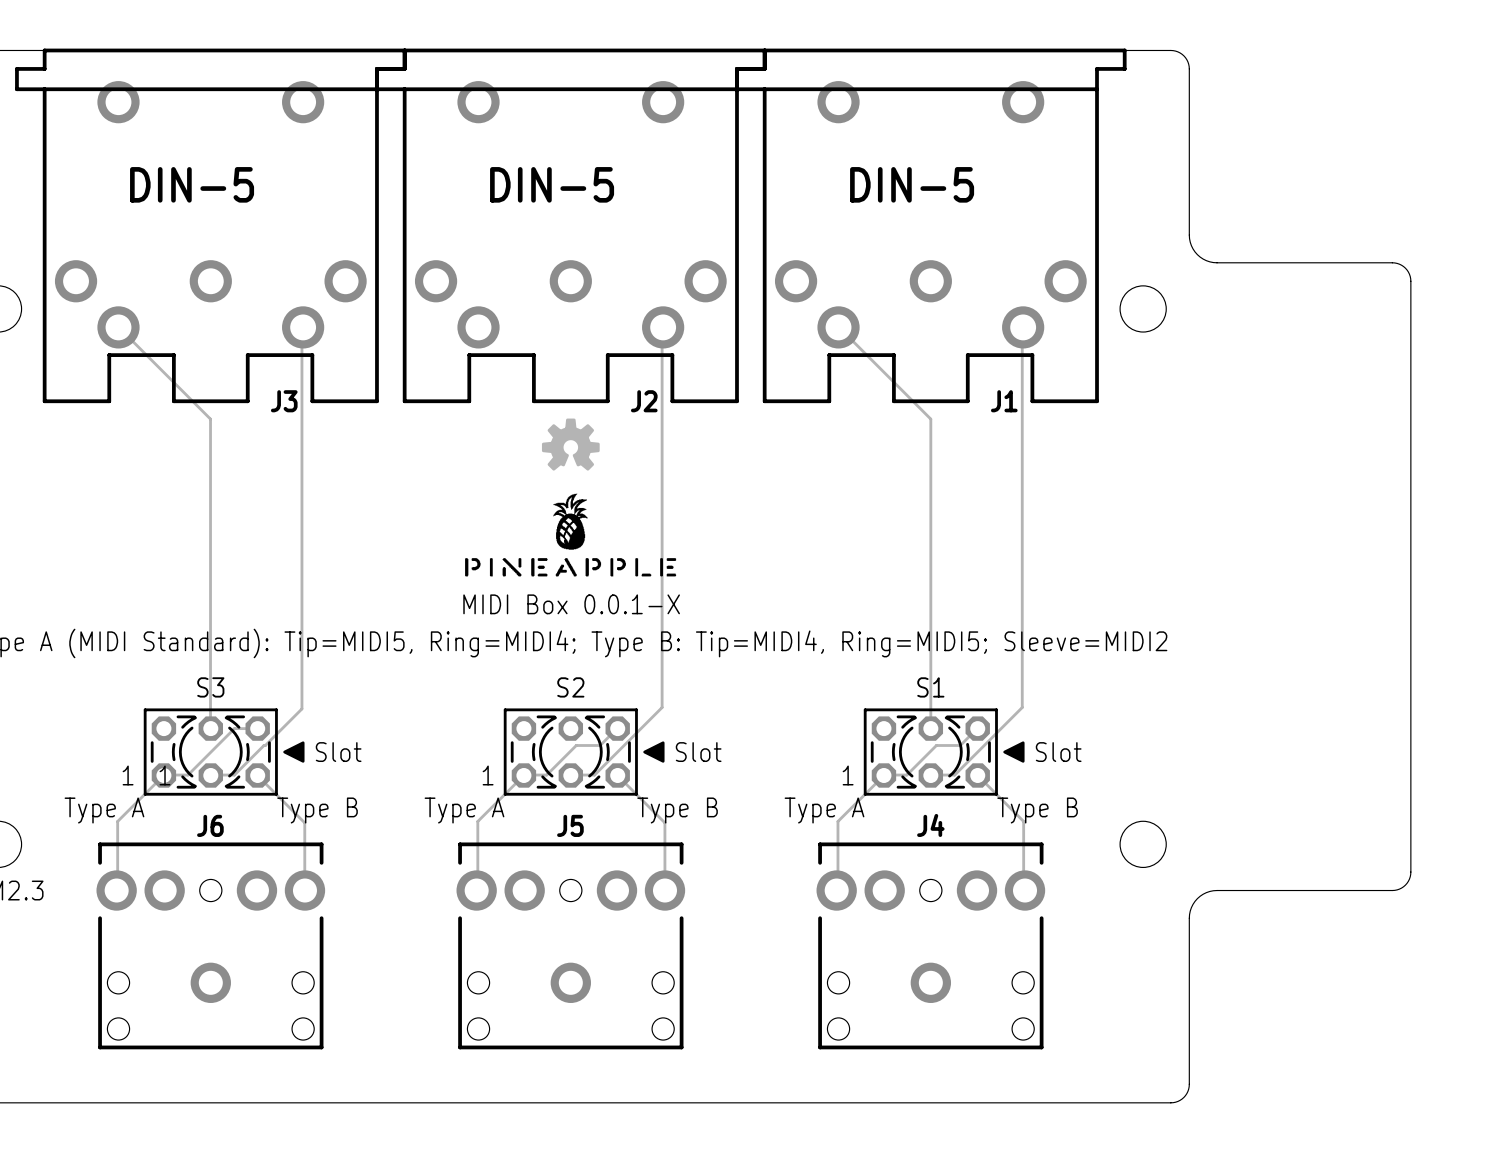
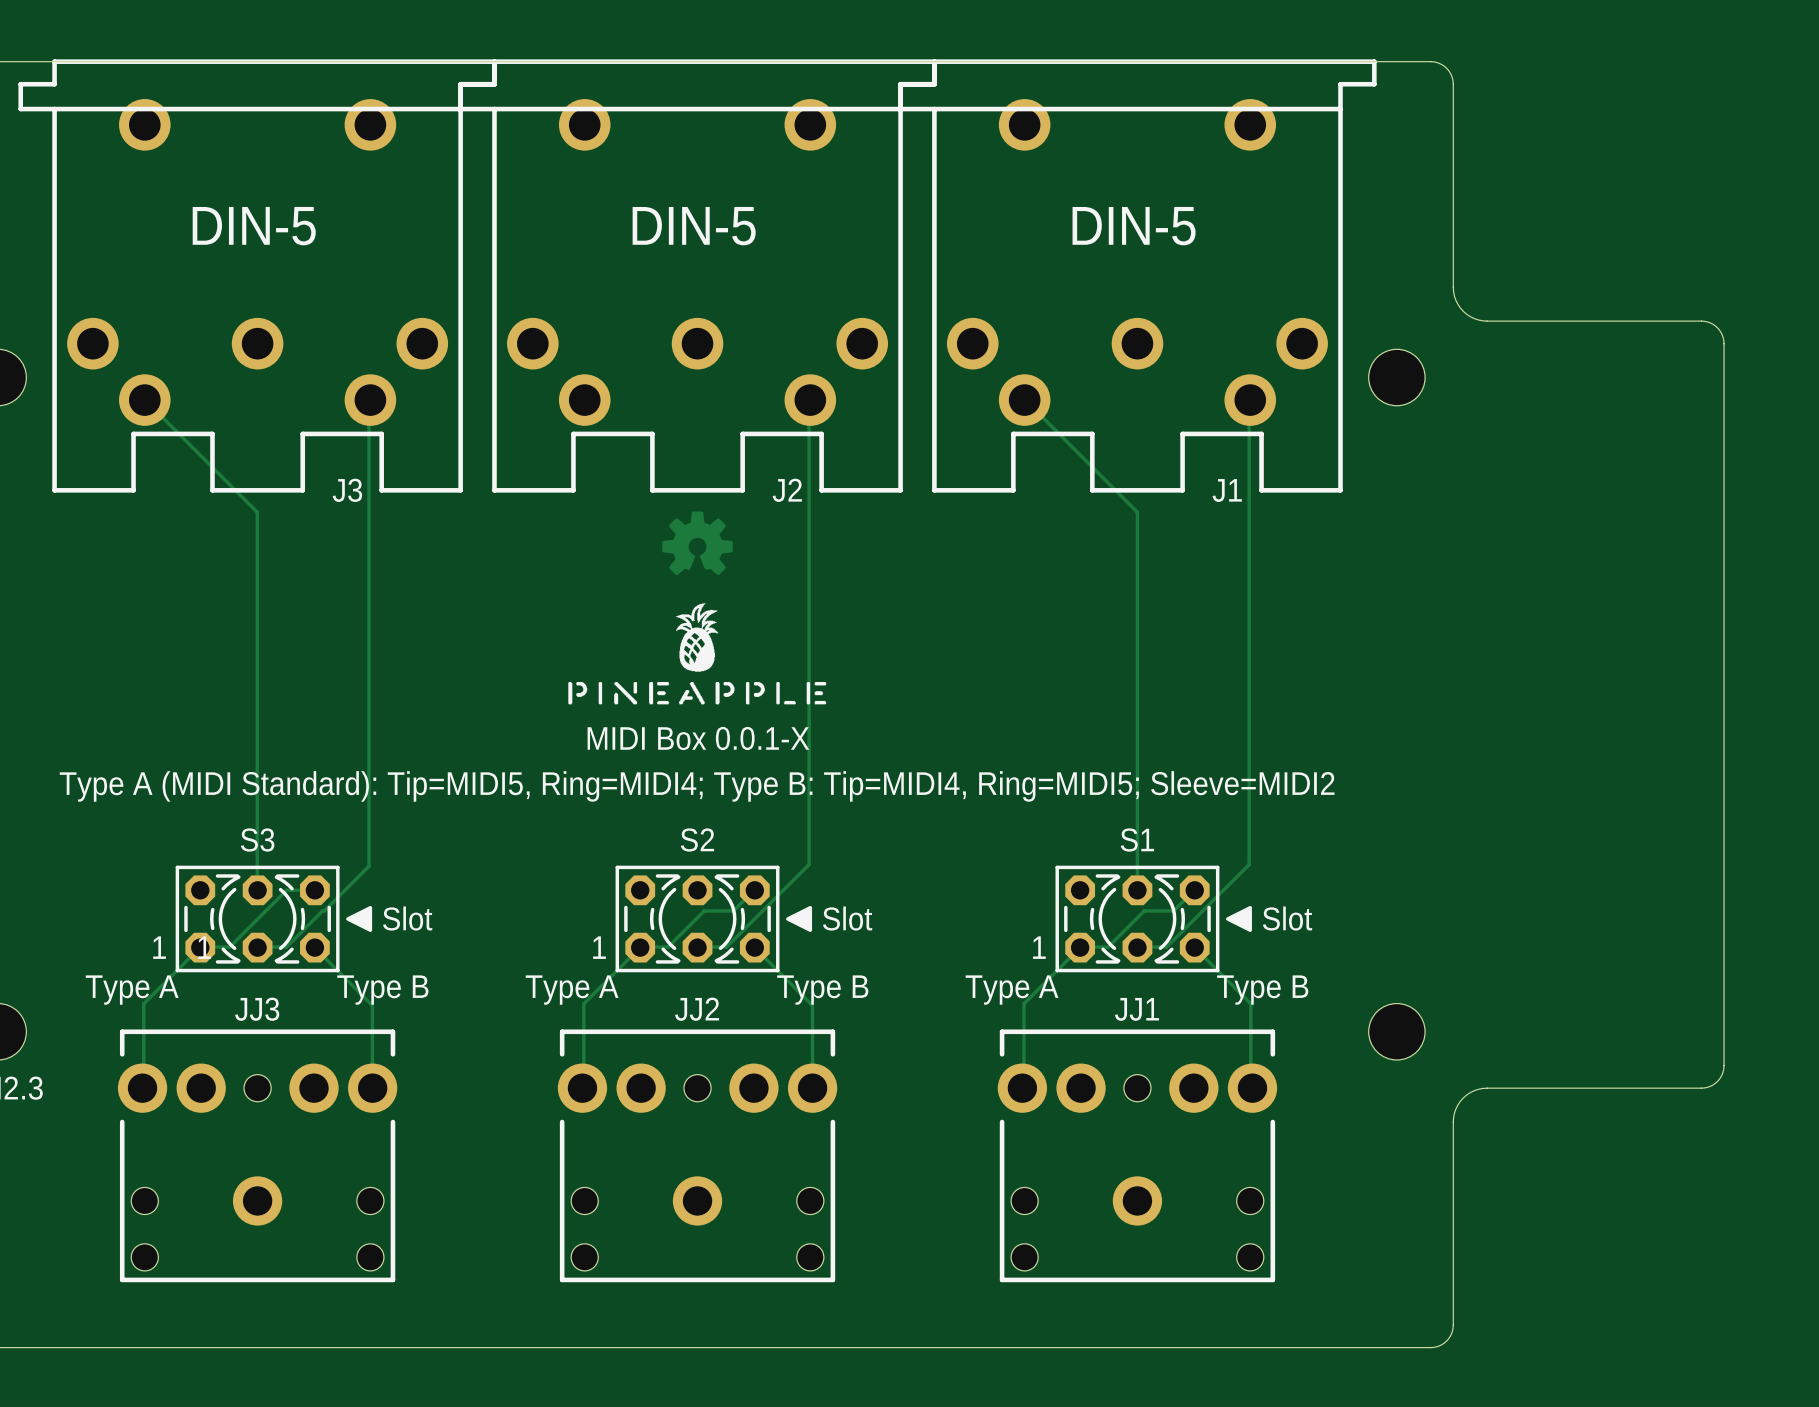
J6 name: J6 (210, 825) -> JJ3 (257, 1009)
J5 name: J5 (570, 825) -> JJ2 (697, 1009)
J4 name: J4 (930, 825) -> JJ1 (1136, 1009)

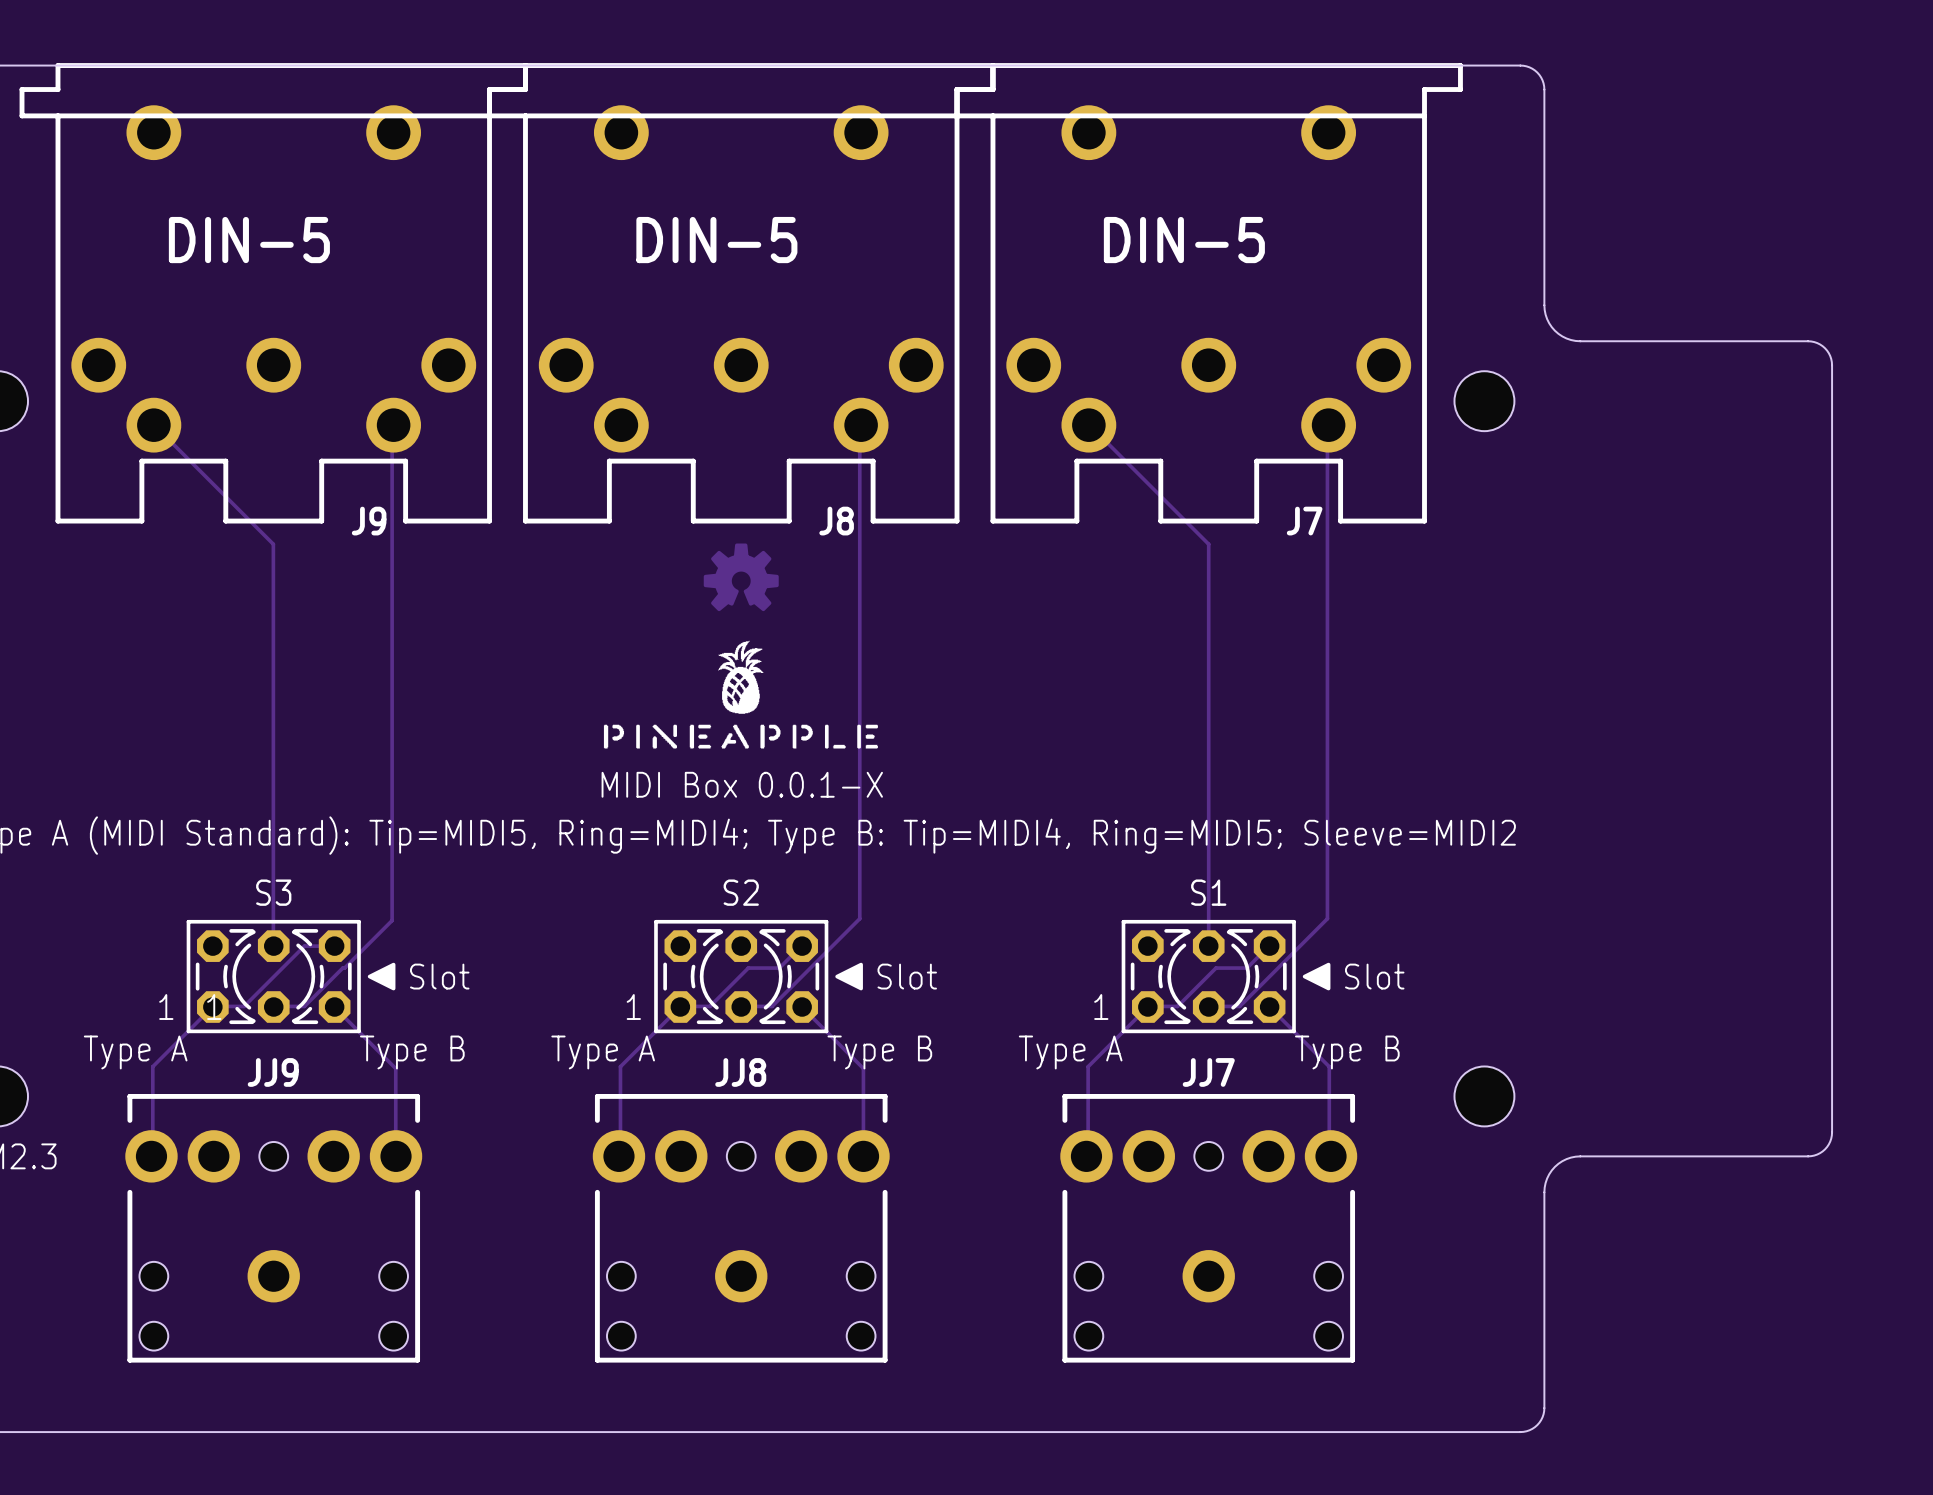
J3 name: J3 (347, 490) -> J9 (369, 521)
J2 name: J2 (787, 490) -> J8 (836, 521)
J1 name: J1 (1227, 490) -> J7 (1304, 521)
JJ3 name: JJ3 (257, 1009) -> JJ9 (273, 1072)
JJ2 name: JJ2 (697, 1009) -> JJ8 (740, 1072)
JJ1 name: JJ1 (1136, 1009) -> JJ7 (1208, 1072)

